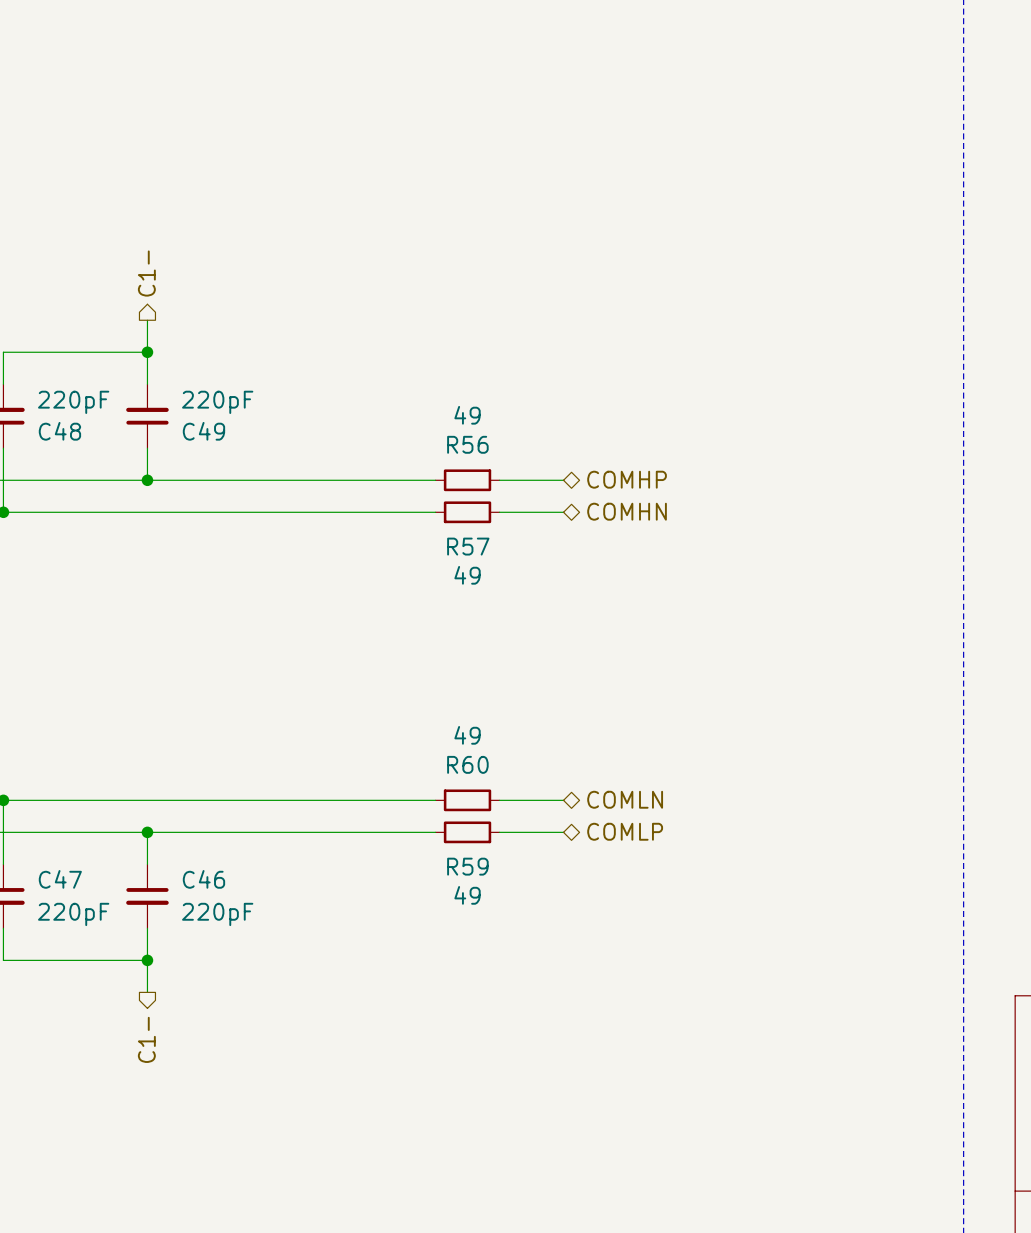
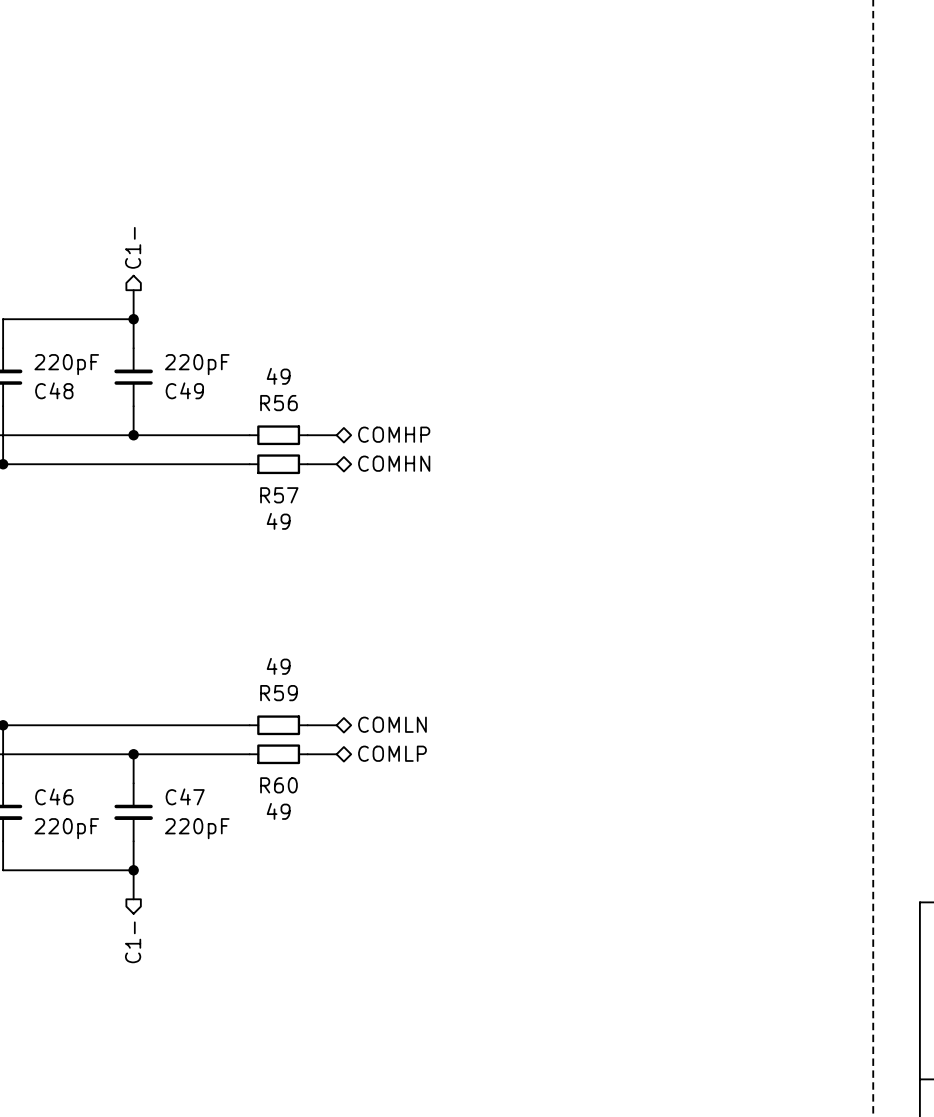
hierarchical label position: COMHP (627, 479) -> COMHP (394, 434)
wire: (275, 480) (339, 480) -> none
wire: (371, 480) (435, 480) -> none
R56 position: (467, 480) -> (278, 435)
wire: (499, 480) (563, 480) -> none
hierarchical label position: COMHN (627, 511) -> COMHN (394, 463)
wire: (275, 512) (339, 512) -> none
wire: (371, 512) (435, 512) -> none
R57 position: (467, 512) -> (278, 464)
wire: (499, 512) (563, 512) -> none
R60 value position: 49 (467, 735) -> 49 (278, 811)
R60 name position: R60 (467, 764) -> R60 (278, 785)
hierarchical label position: COMLN (625, 799) -> COMLN (392, 724)
wire: (275, 800) (339, 800) -> none
wire: (371, 800) (435, 800) -> none
R60 position: (467, 800) -> (278, 754)
wire: (499, 800) (563, 800) -> none
hierarchical label position: COMLP (625, 831) -> COMLP (392, 753)
wire: (275, 832) (339, 832) -> none
wire: (371, 832) (435, 832) -> none
R59 position: (467, 832) -> (278, 725)
wire: (499, 832) (563, 832) -> none
R59 name position: R59 (467, 866) -> R59 (278, 693)
C47 name: C47 (60, 879) -> C46 (54, 796)
C46 name: C46 (203, 879) -> C47 (185, 796)
R59 value position: 49 (467, 895) -> 49 (278, 666)

